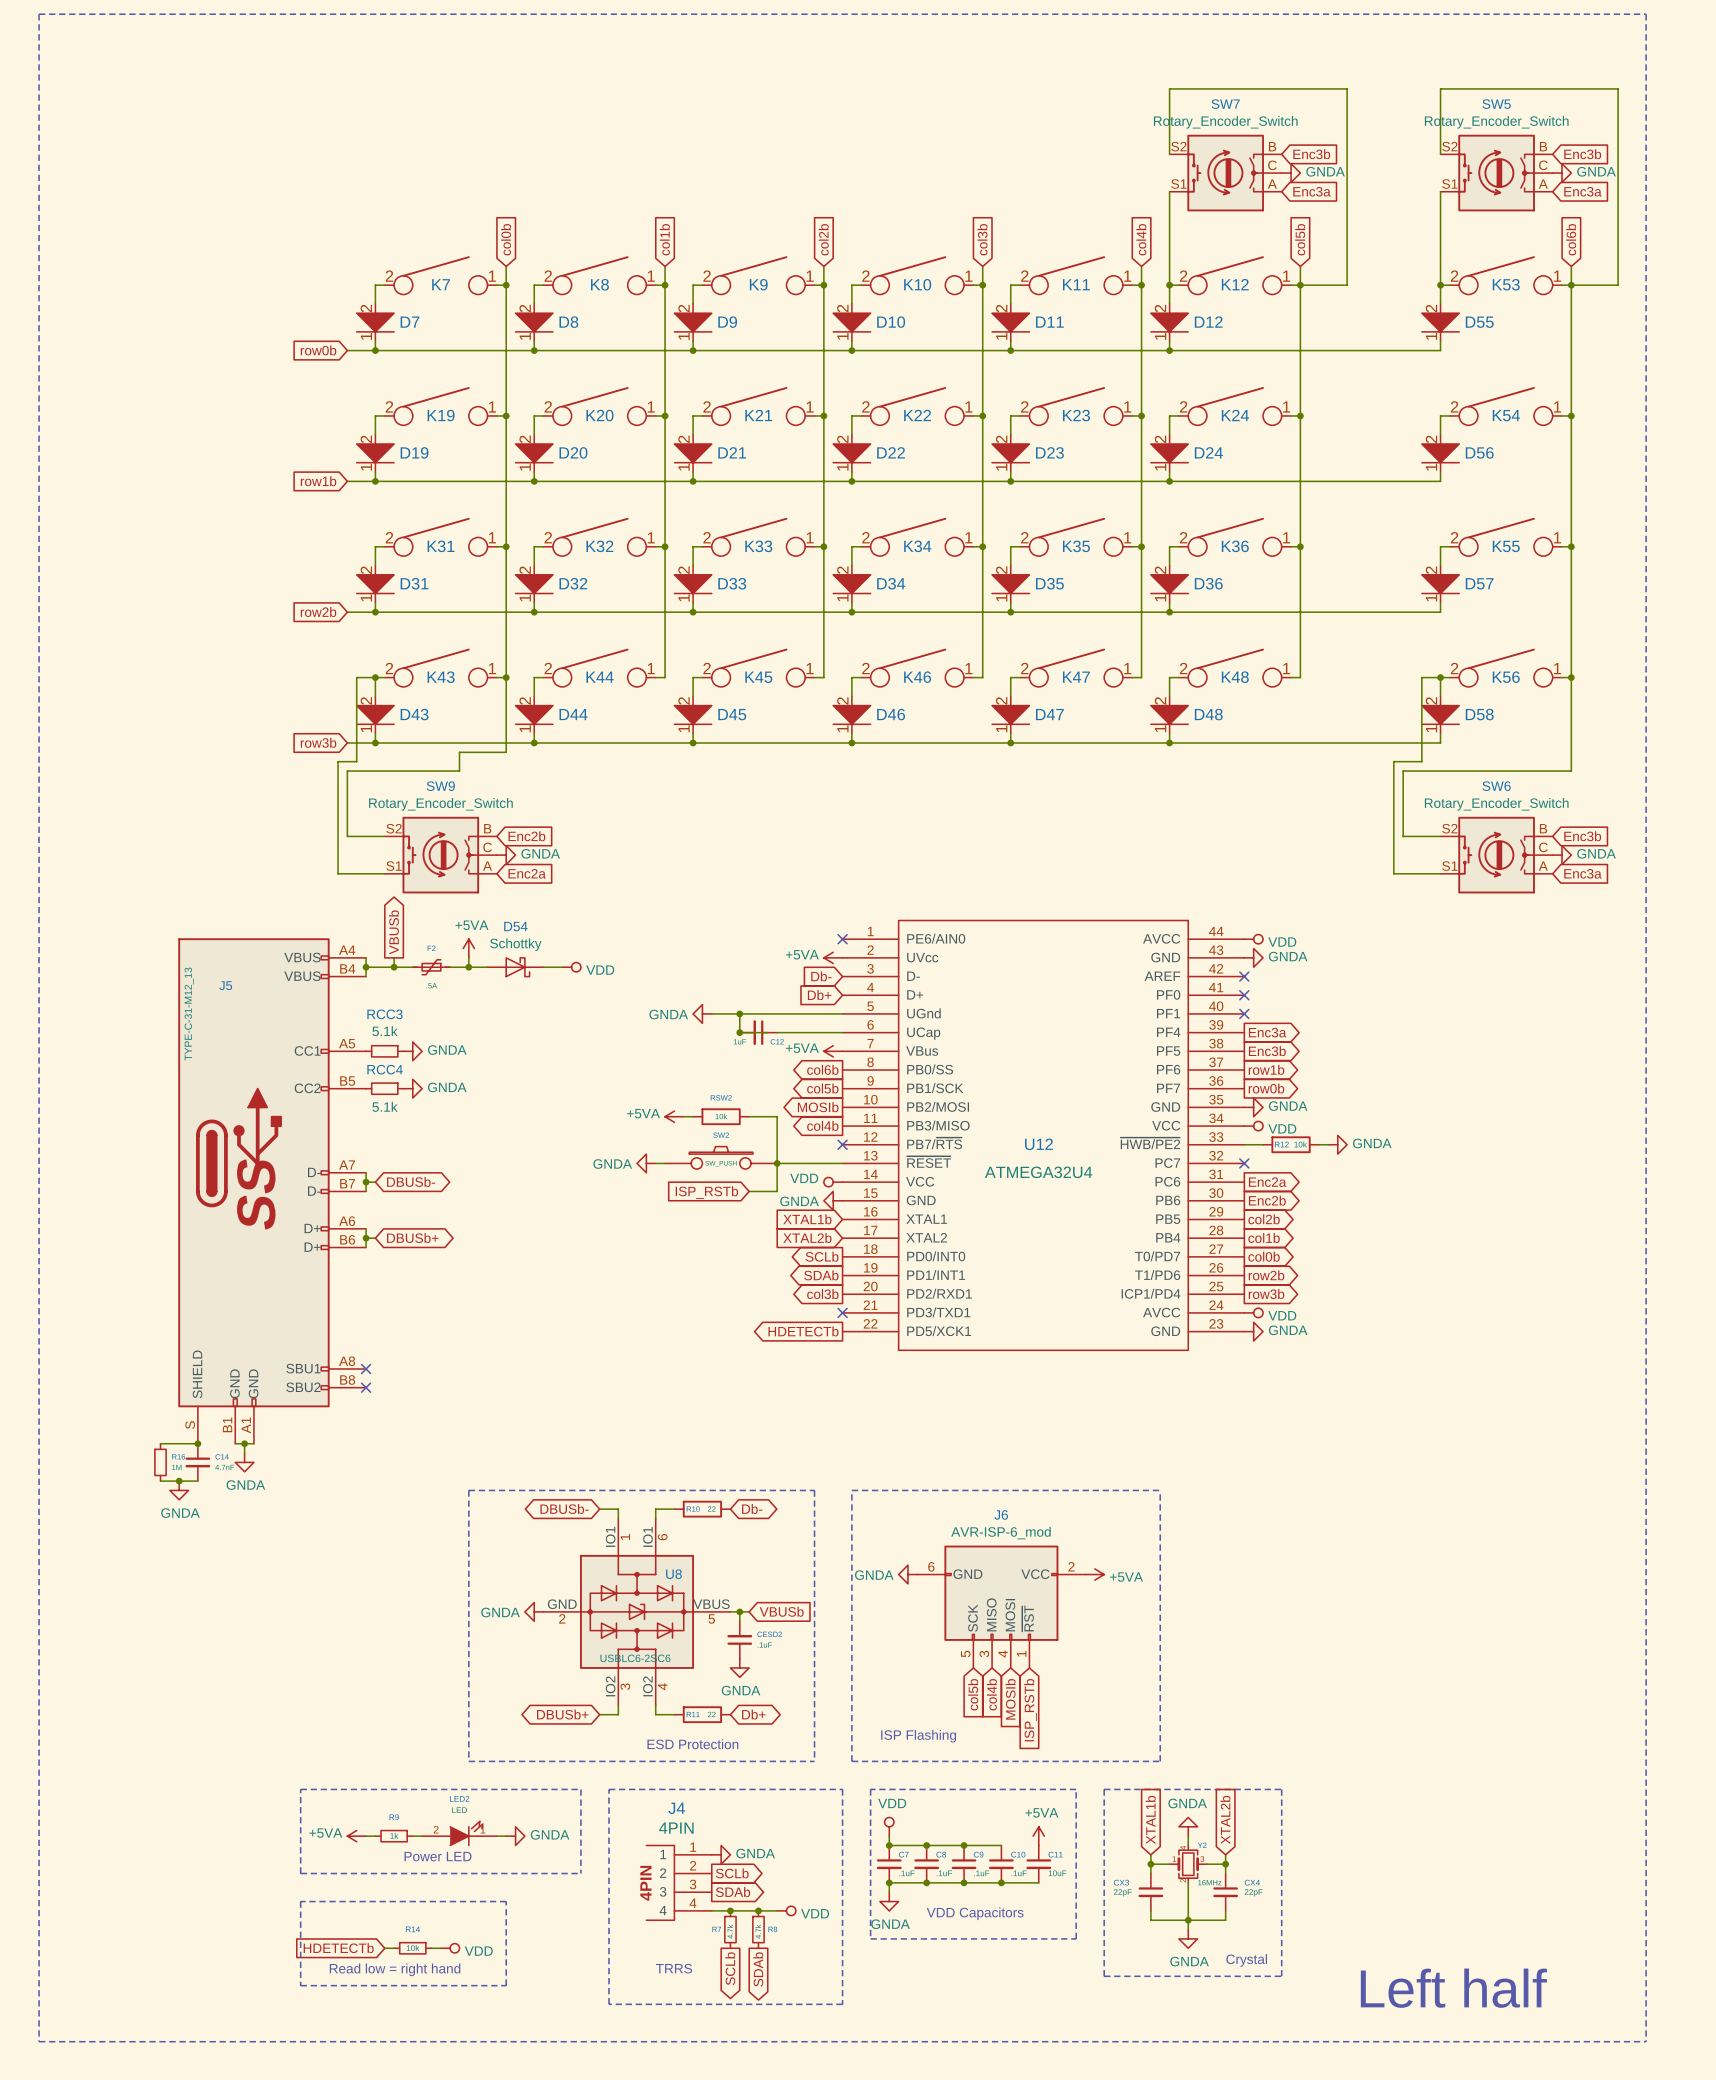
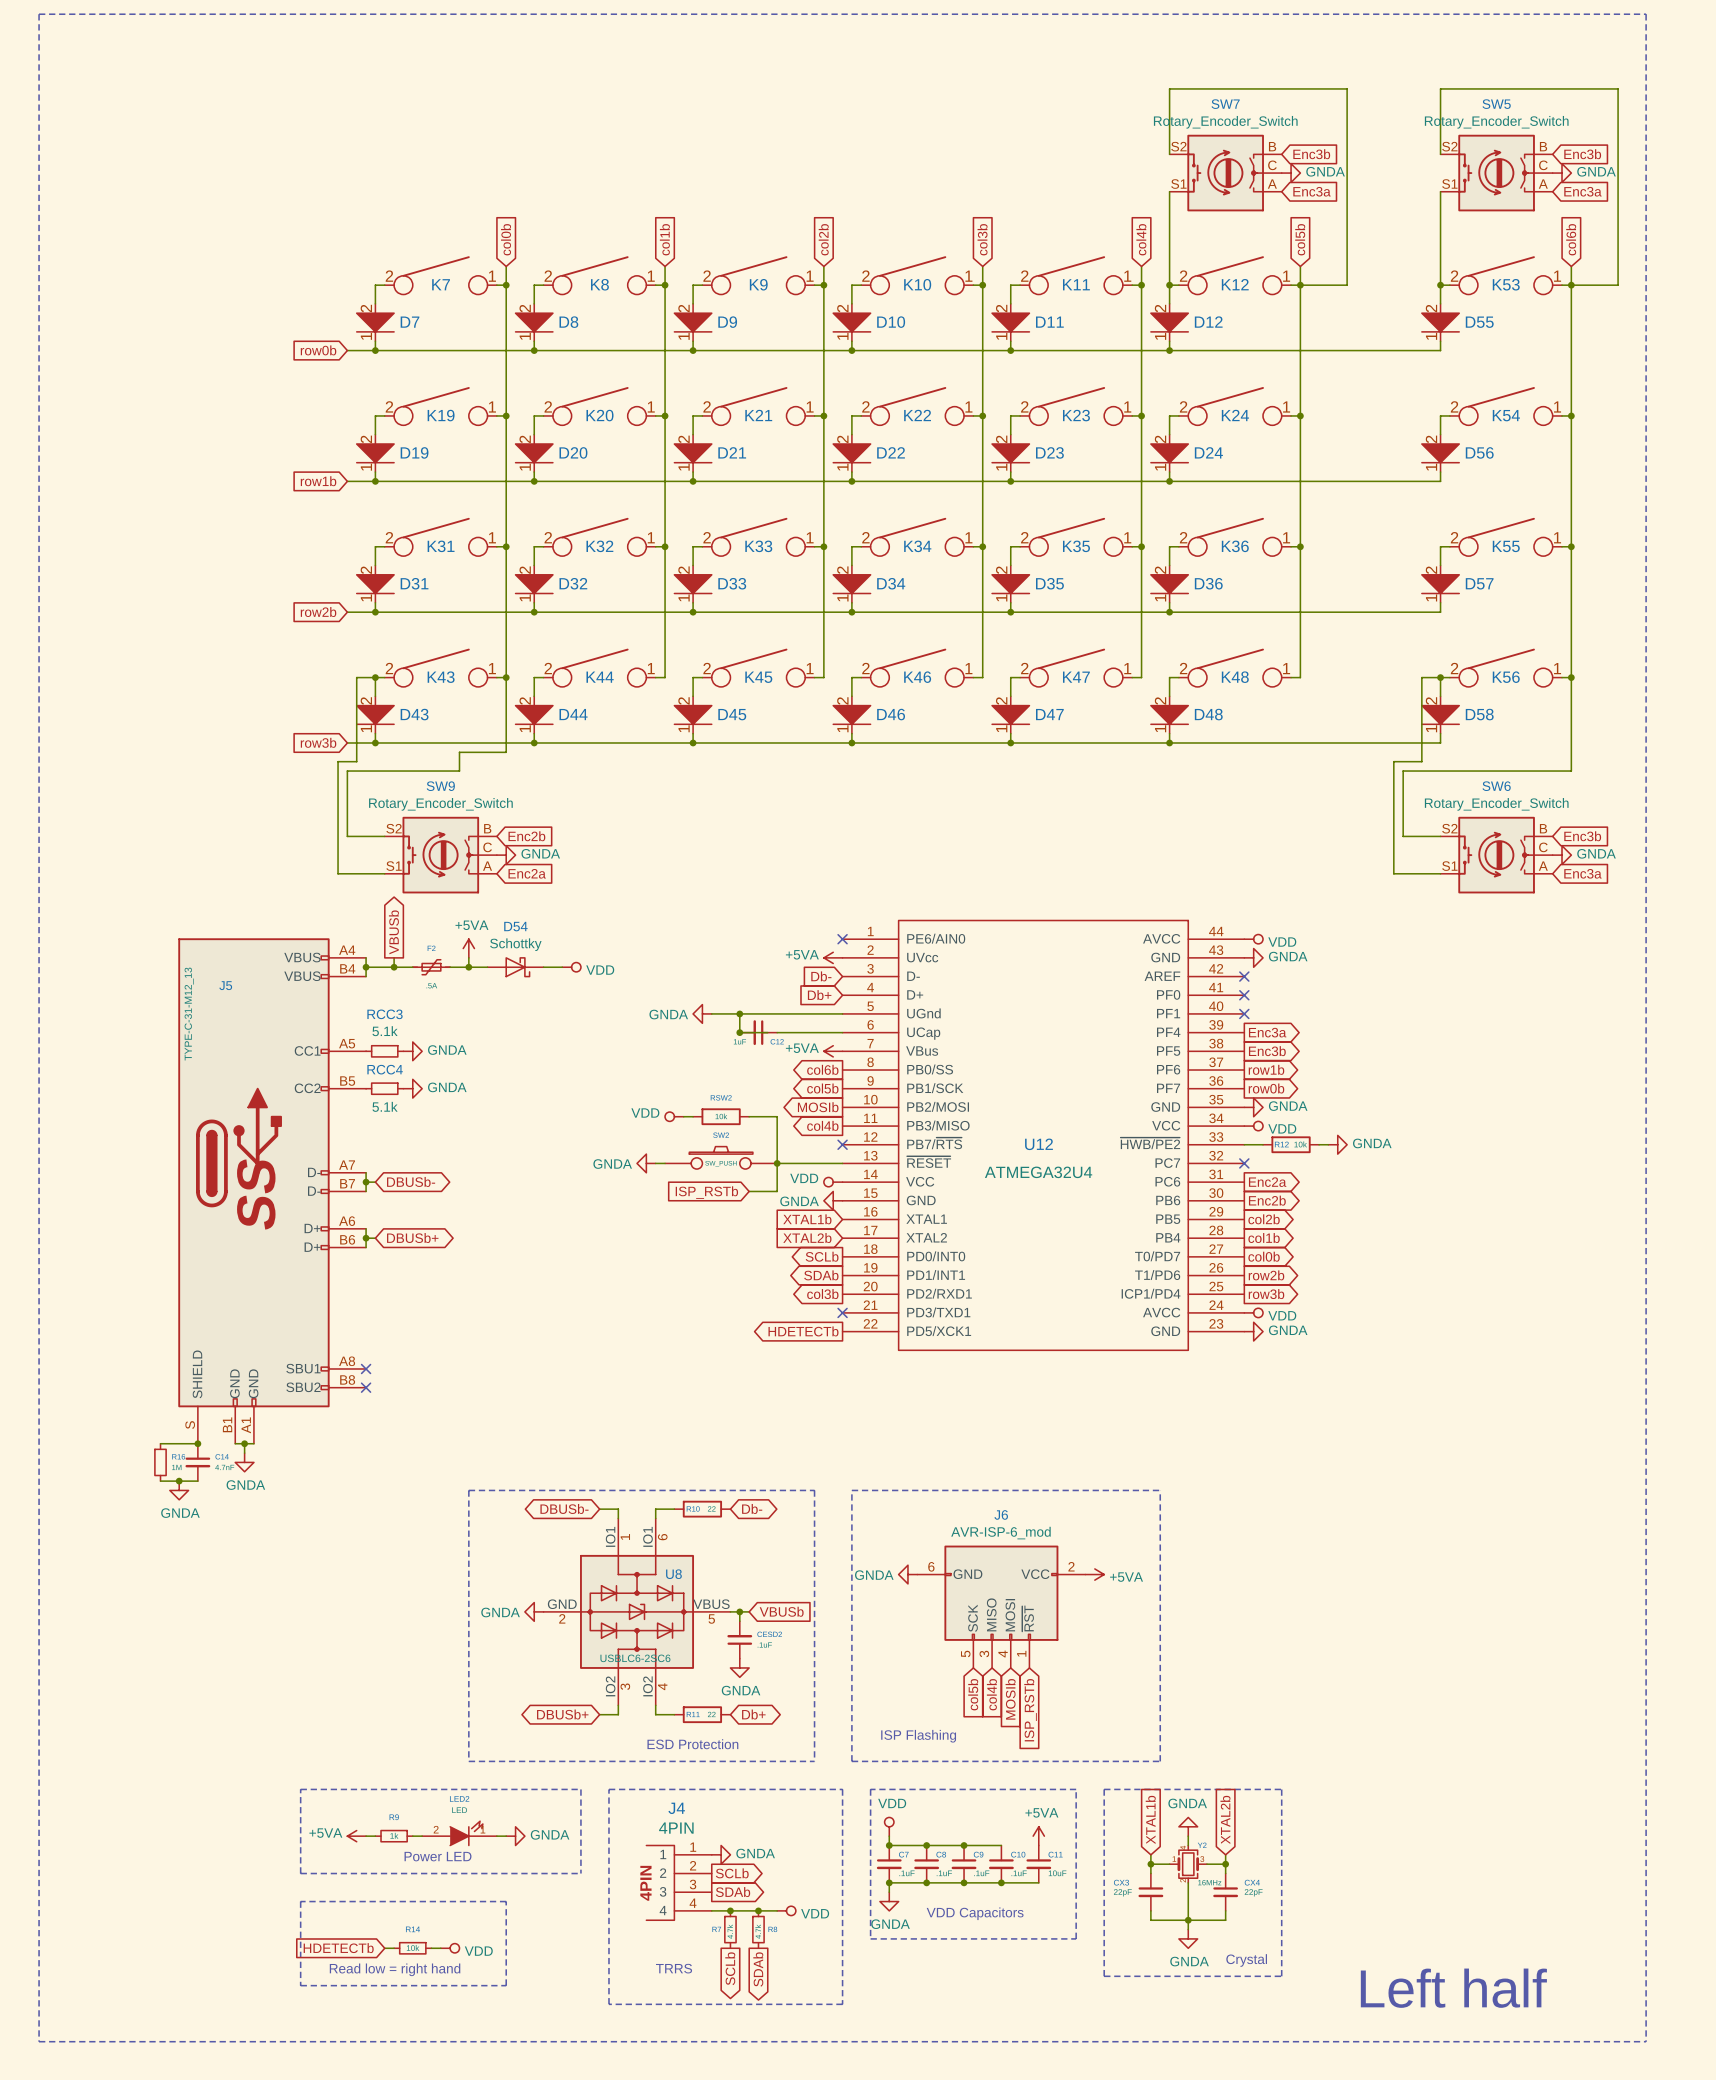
power symbol: +5VA (674, 1116) -> VDD (674, 1116)

